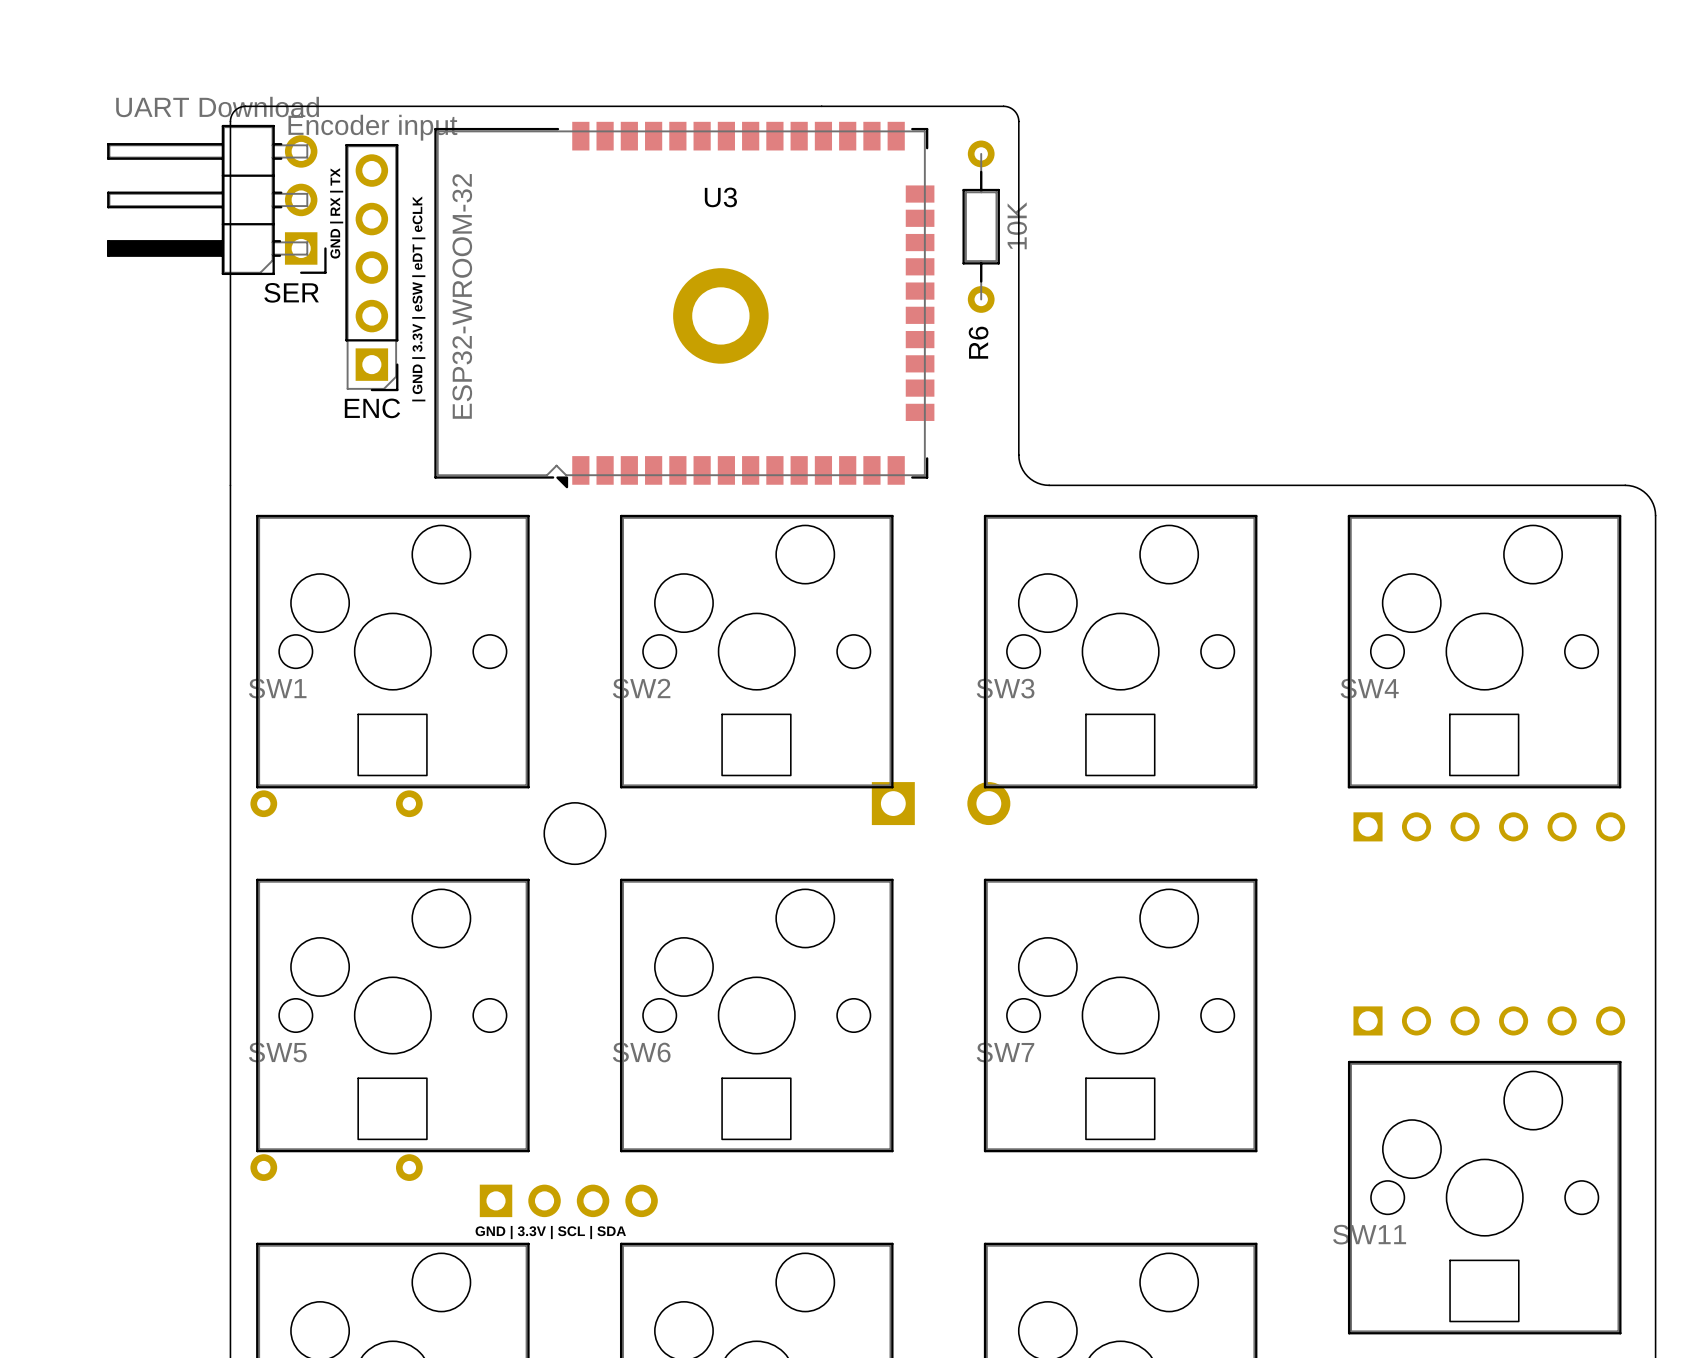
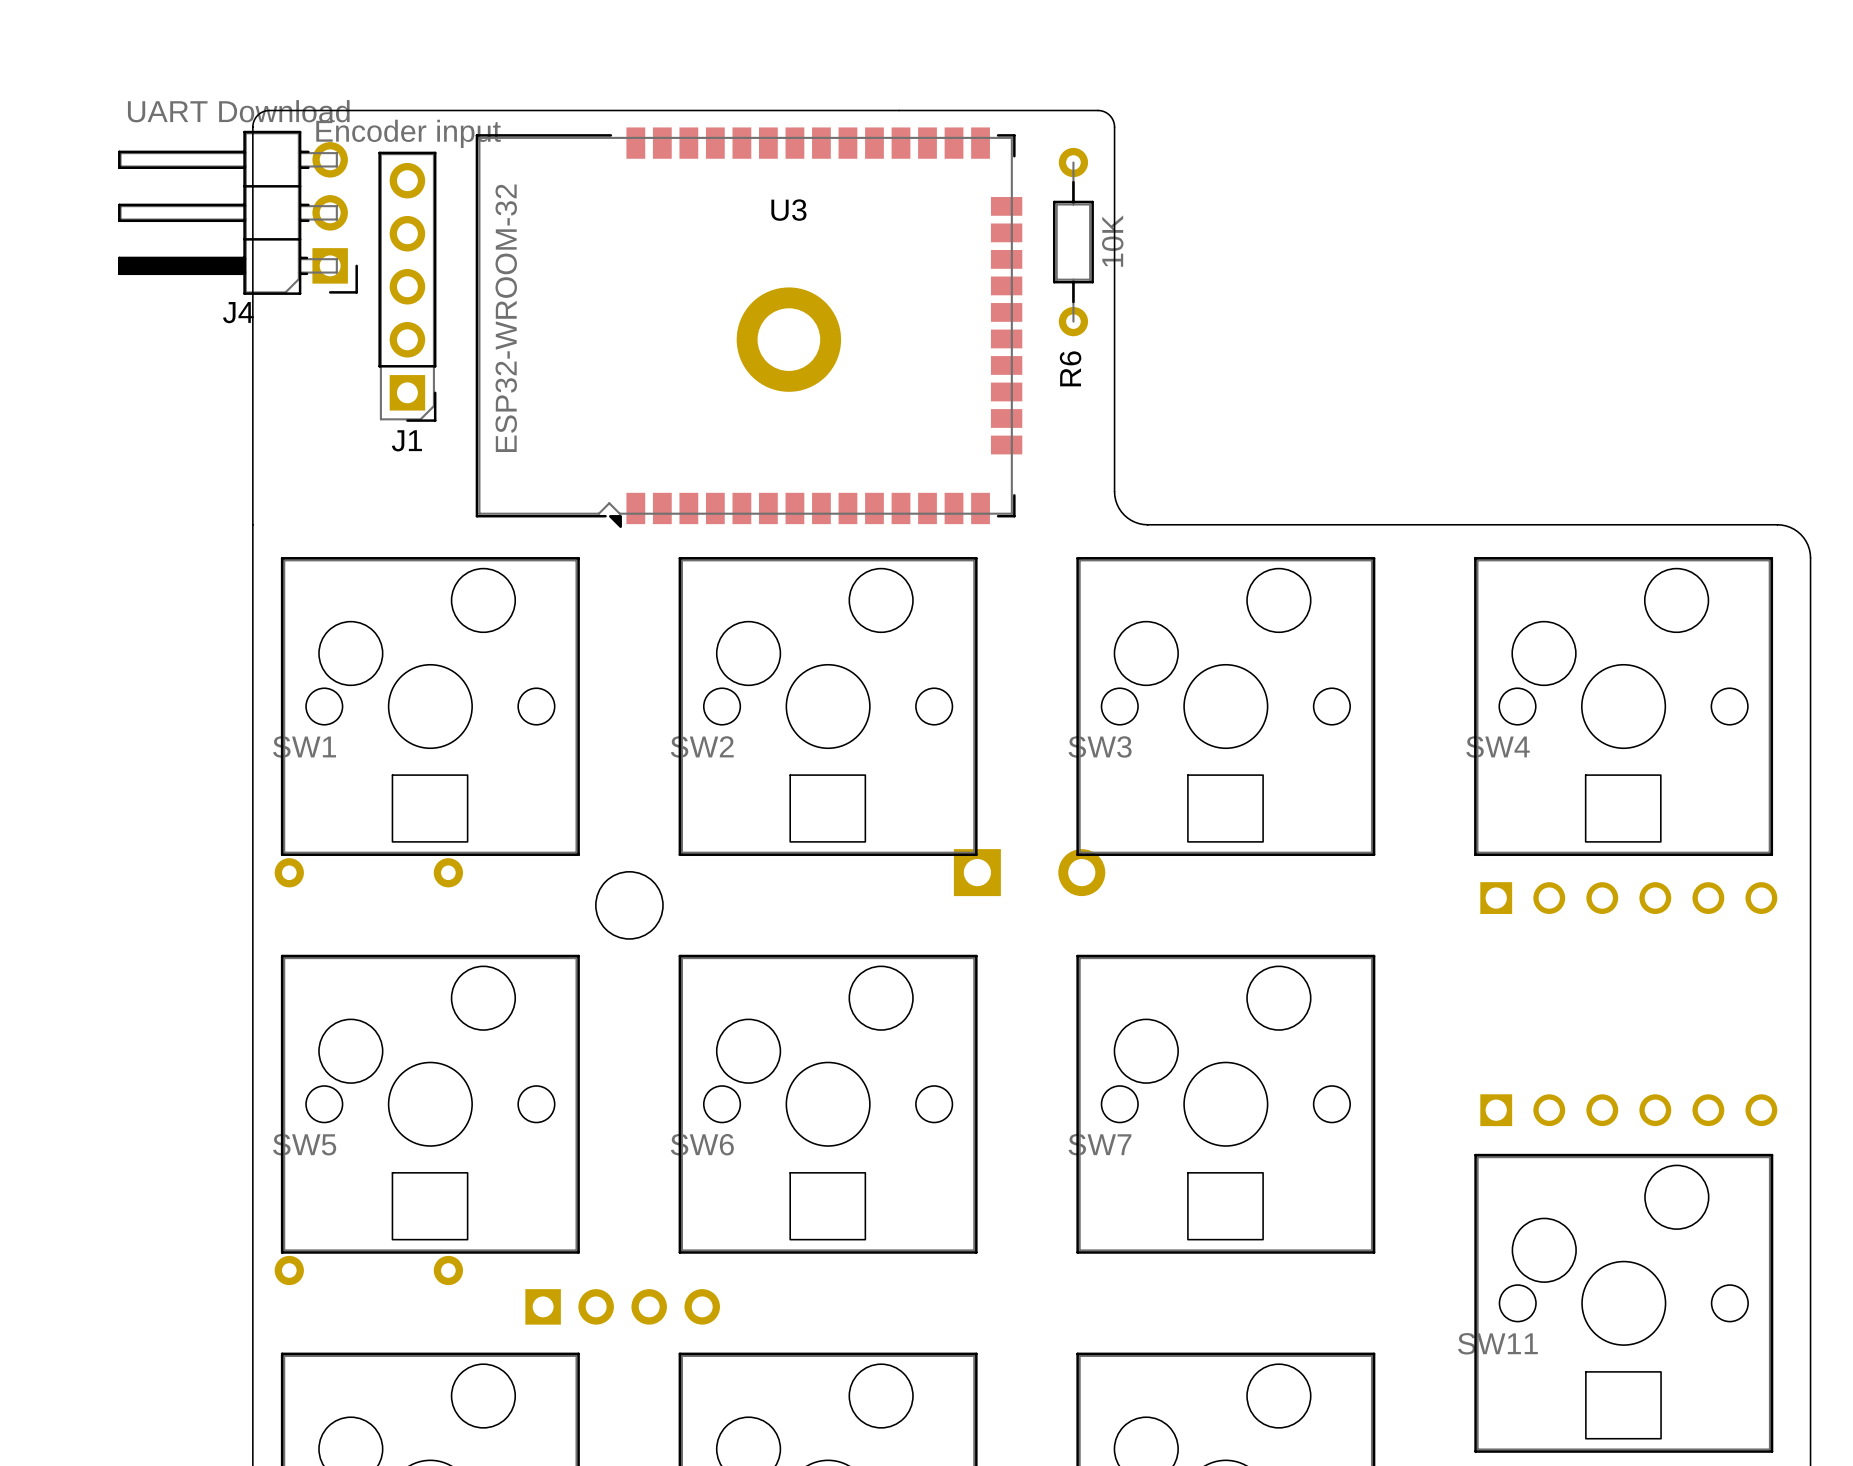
text: GND | RX | TX (336, 213) -> none
SER name: SER (291, 292) -> J4 (238, 312)
text: | GND | 3.3V | eSW | eDT | eCLK (418, 298) -> none
ENC name: ENC (372, 408) -> J1 (406, 440)
text: GND | 3.3V | SCL | SDA (550, 1232) -> none

